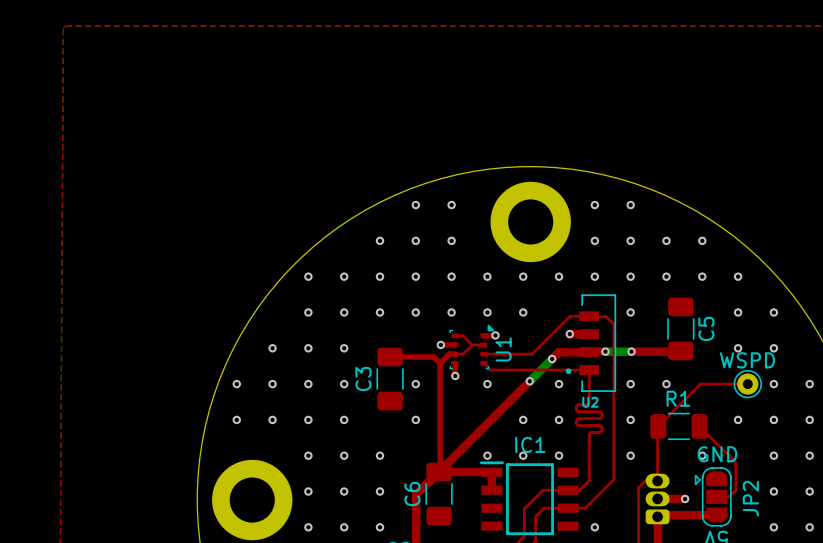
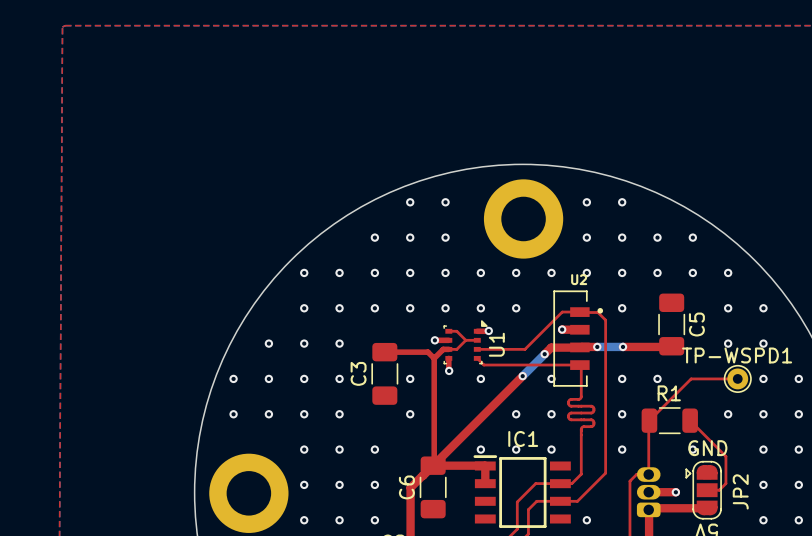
U2 rotation: 0° (590, 343) -> 180° (578, 338)
WSPD name: WSPD (747, 360) -> TP-WSPD1 (737, 355)

